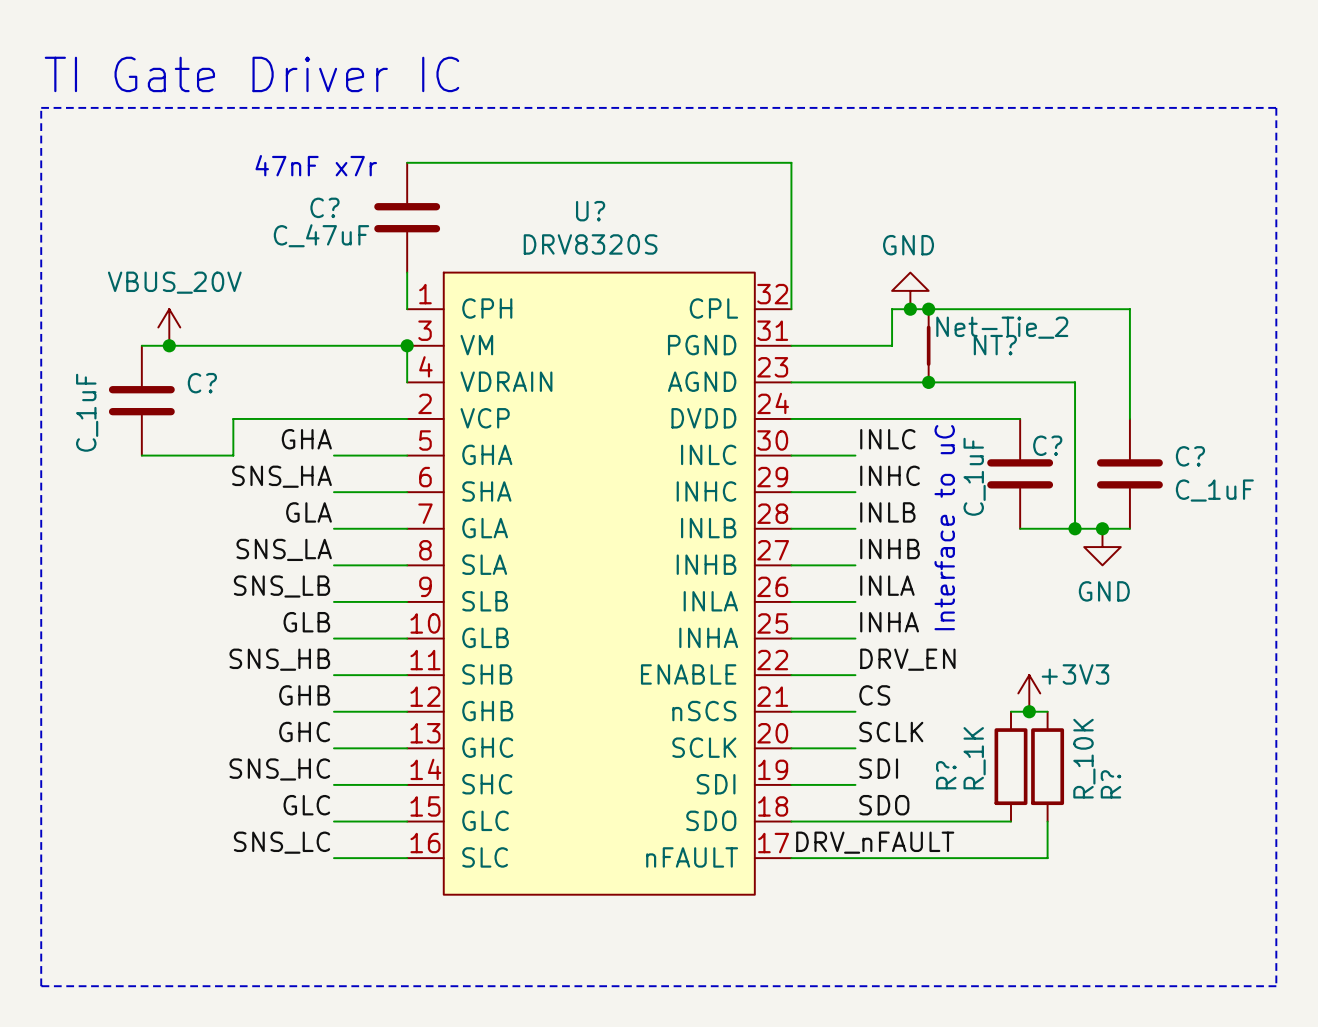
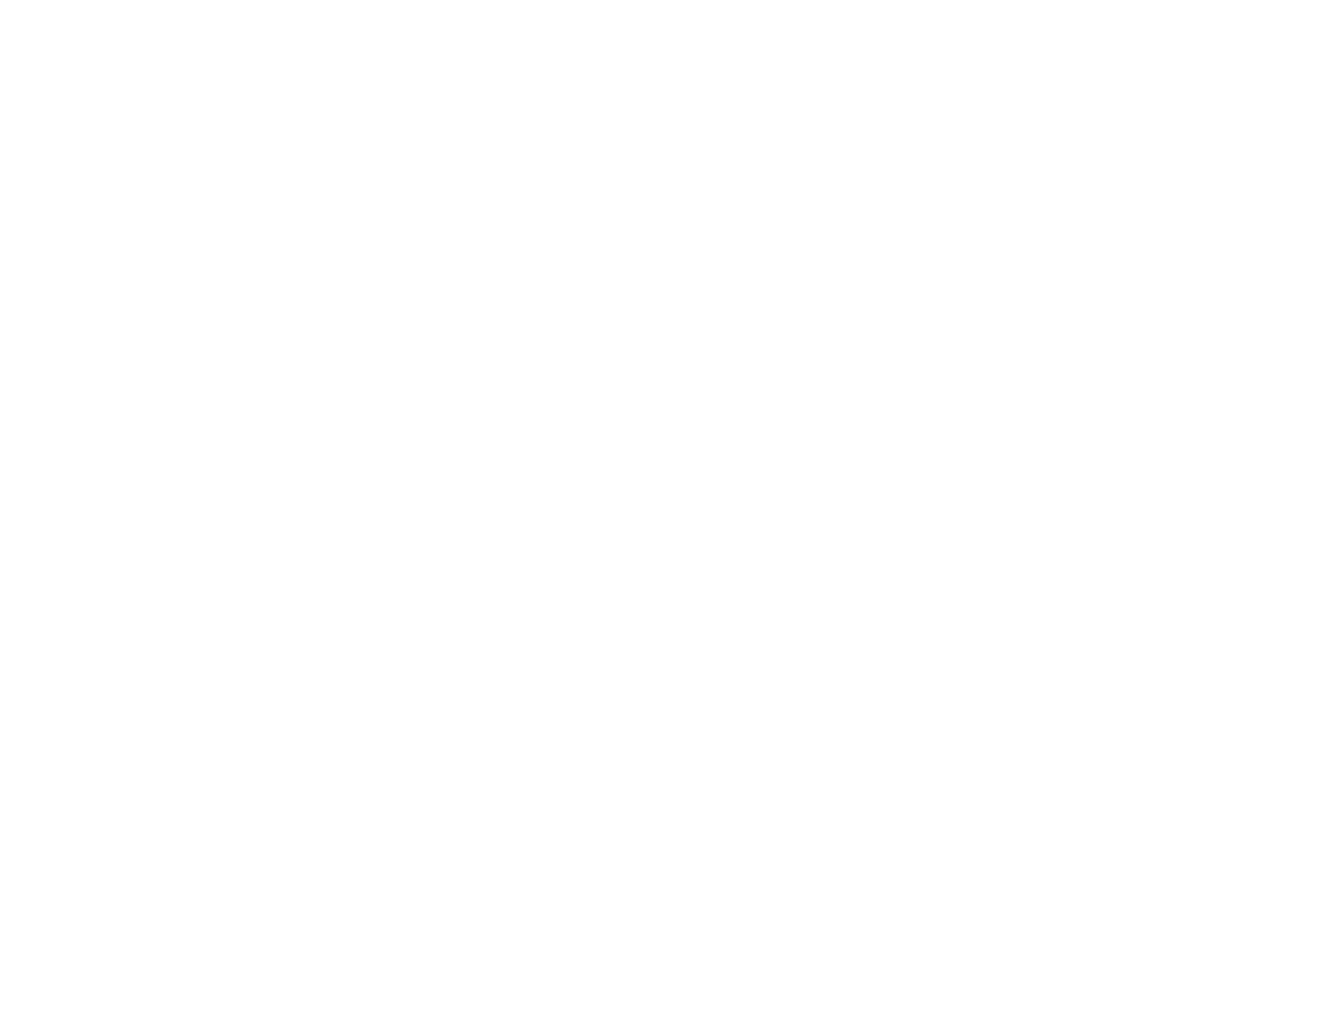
text: TI Gate Driver IC (251, 74) -> none
line: (41, 107) (1276, 107) (1276, 986) (41, 986) (41, 107) -> none
wire: (407, 162) (791, 162) (791, 309) -> none
text: 47nF x7r (316, 165) -> none
C?: C_47uF (407, 217) -> none
wire: (407, 272) (407, 309) -> none
power symbol: GND (910, 290) -> none
junction: (910, 309) -> none
junction: (928, 309) -> none
power symbol: VBUS_20V (169, 327) -> none
wire: (141, 345) (407, 345) (407, 382) -> none
junction: (169, 345) -> none
junction: (407, 345) -> none
wire: (791, 345) (892, 345) (892, 309) (1129, 309) (1129, 418) -> none
NT?: Net-Tie_2 (928, 345) -> none
wire: (791, 382) (1075, 382) (1075, 528) -> none
junction: (928, 382) -> none
C?: C_1uF (141, 400) -> none
wire: (407, 418) (233, 418) (233, 455) (141, 455) -> none
wire: (791, 418) (1020, 418) -> none
label: GHA (306, 439) -> none
label: INLC (887, 439) -> none
wire: (333, 455) (407, 455) -> none
wire: (791, 455) (855, 455) -> none
C?: C_1uF (1020, 473) -> none
C?: C_1uF (1129, 473) -> none
label: INHC (890, 475) -> none
label: SNS_HA (282, 476) -> none
wire: (333, 492) (407, 492) -> none
wire: (791, 492) (855, 492) -> none
label: GLA (309, 512) -> none
label: INLB (887, 512) -> none
text: Interface to uC (944, 527) -> none
wire: (333, 528) (407, 528) -> none
wire: (791, 528) (855, 528) -> none
wire: (1020, 528) (1129, 528) -> none
junction: (1075, 528) -> none
junction: (1102, 528) -> none
power symbol: GND (1102, 547) -> none
label: SNS_LA (284, 549) -> none
label: INHB (890, 549) -> none
wire: (333, 565) (407, 565) -> none
wire: (791, 565) (855, 565) -> none
U?: DRV8320S (599, 583) -> none
label: INLA (887, 585) -> none
label: SNS_LB (282, 586) -> none
wire: (333, 601) (407, 601) -> none
wire: (791, 601) (855, 601) -> none
label: GLB (306, 622) -> none
label: INHA (889, 622) -> none
wire: (333, 638) (407, 638) -> none
wire: (791, 638) (855, 638) -> none
label: SNS_HB (279, 659) -> none
label: DRV_EN (907, 659) -> none
wire: (333, 675) (407, 675) -> none
wire: (791, 675) (855, 675) -> none
power symbol: +3V3 (1029, 693) -> none
label: GHB (304, 695) -> none
label: CS (874, 695) -> none
wire: (333, 711) (407, 711) -> none
wire: (791, 711) (855, 711) -> none
wire: (1011, 711) (1047, 711) -> none
junction: (1029, 711) -> none
label: GHC (304, 732) -> none
label: SCLK (891, 732) -> none
wire: (333, 748) (407, 748) -> none
wire: (791, 748) (855, 748) -> none
R?: R_1K (1011, 766) -> none
R?: R_10K (1047, 766) -> none
label: SDI (878, 768) -> none
label: SNS_HC (279, 769) -> none
wire: (333, 784) (407, 784) -> none
wire: (791, 784) (855, 784) -> none
label: GLC (306, 805) -> none
label: SDO (884, 805) -> none
wire: (333, 821) (407, 821) -> none
wire: (791, 821) (1011, 821) -> none
wire: (1047, 821) (1047, 858) (791, 858) -> none
label: SNS_LC (282, 842) -> none
label: DRV_nFAULT (875, 842) -> none
wire: (333, 858) (407, 858) -> none

